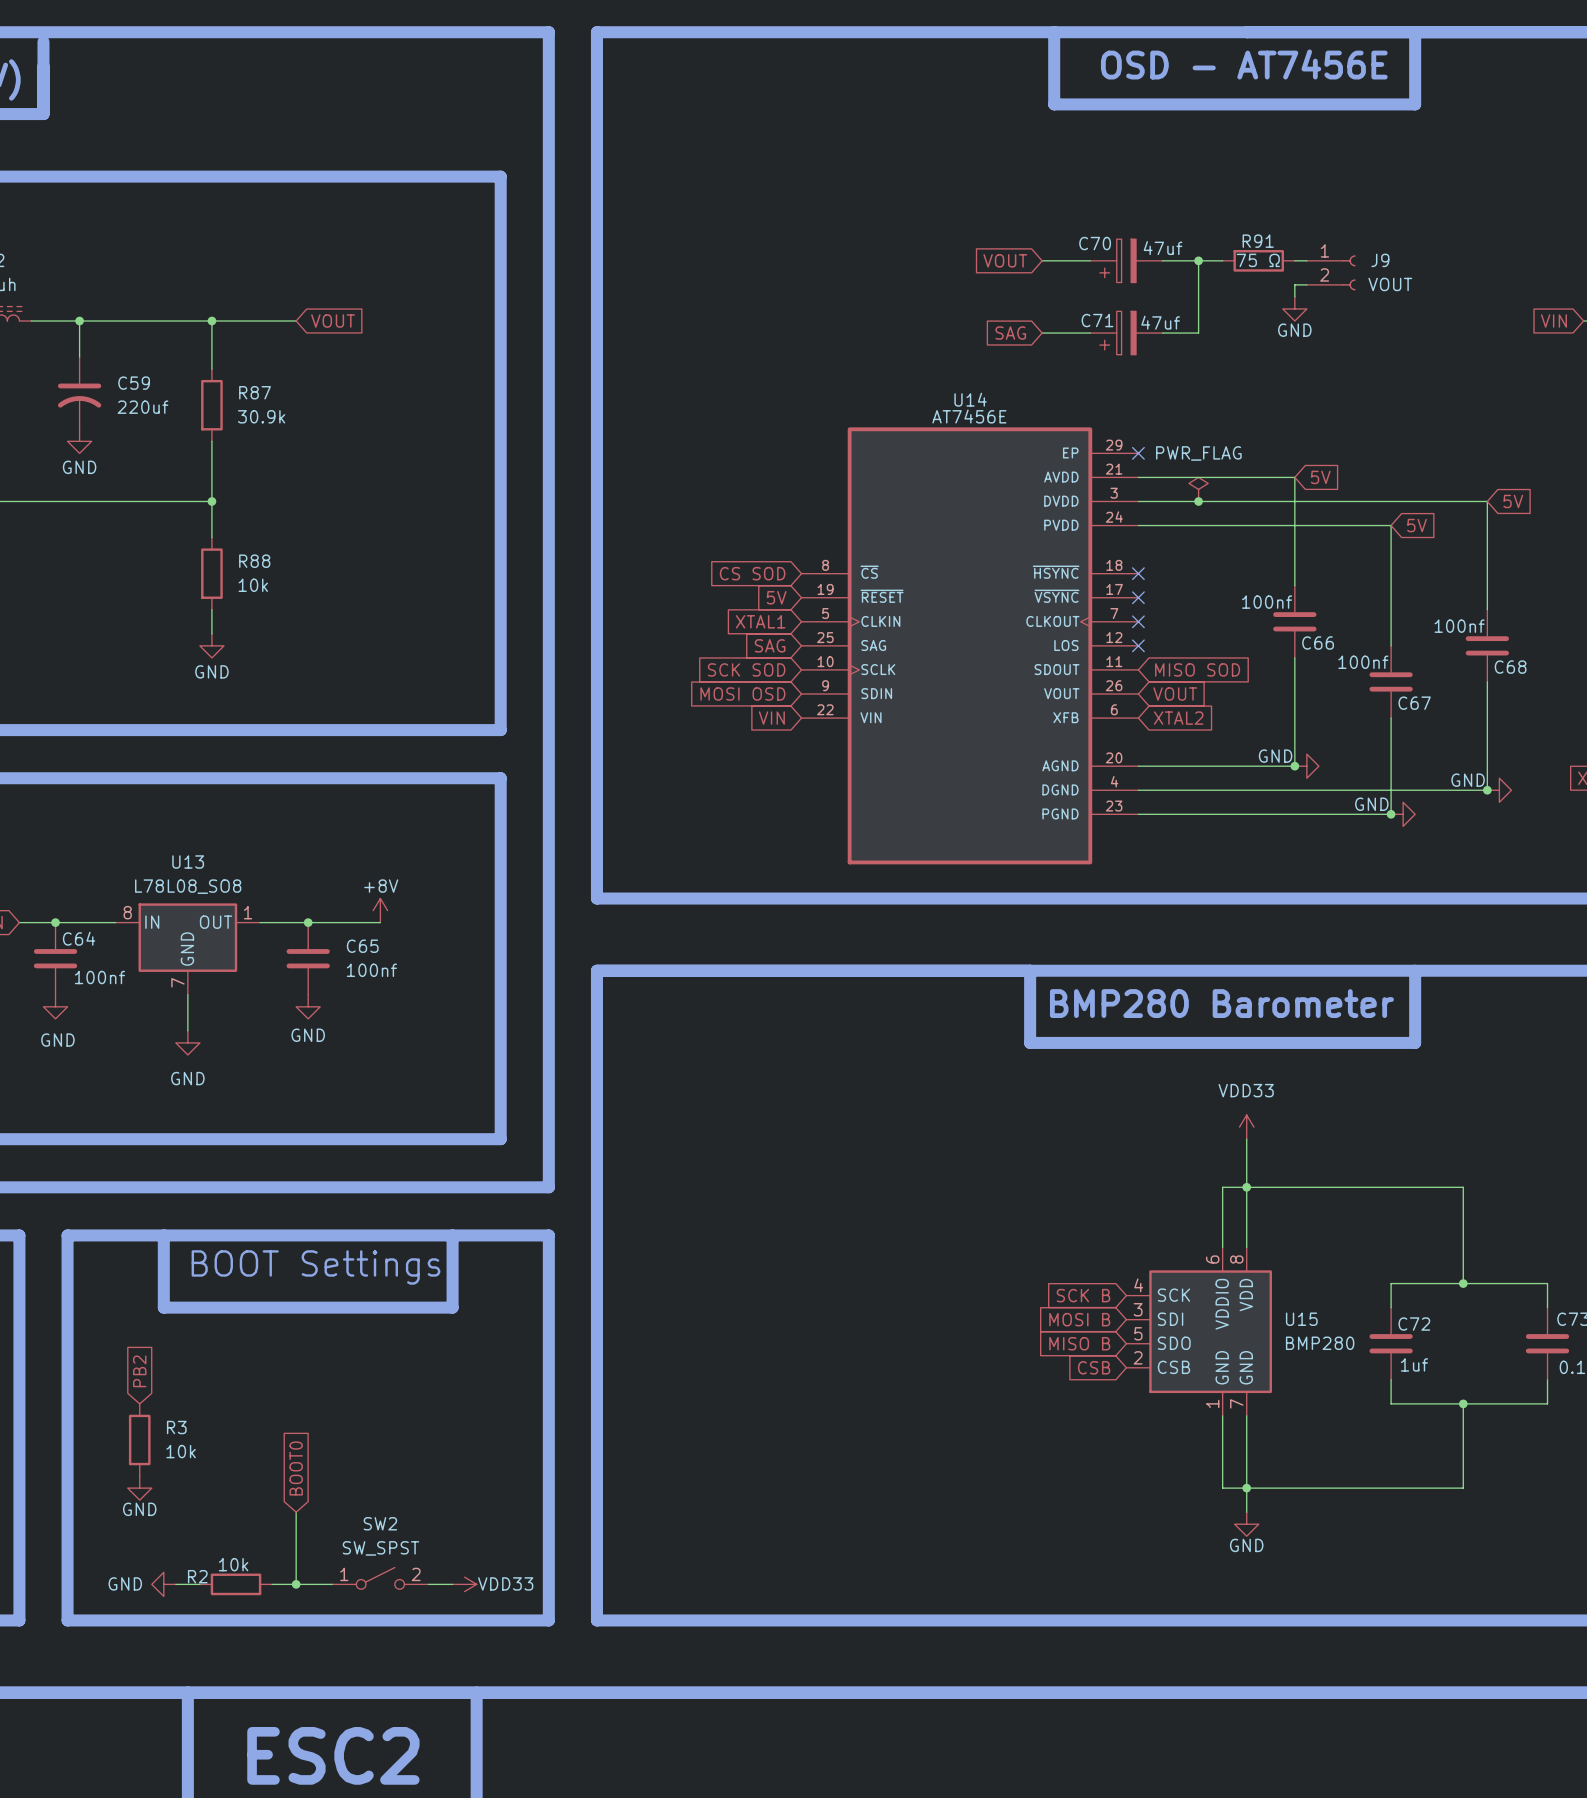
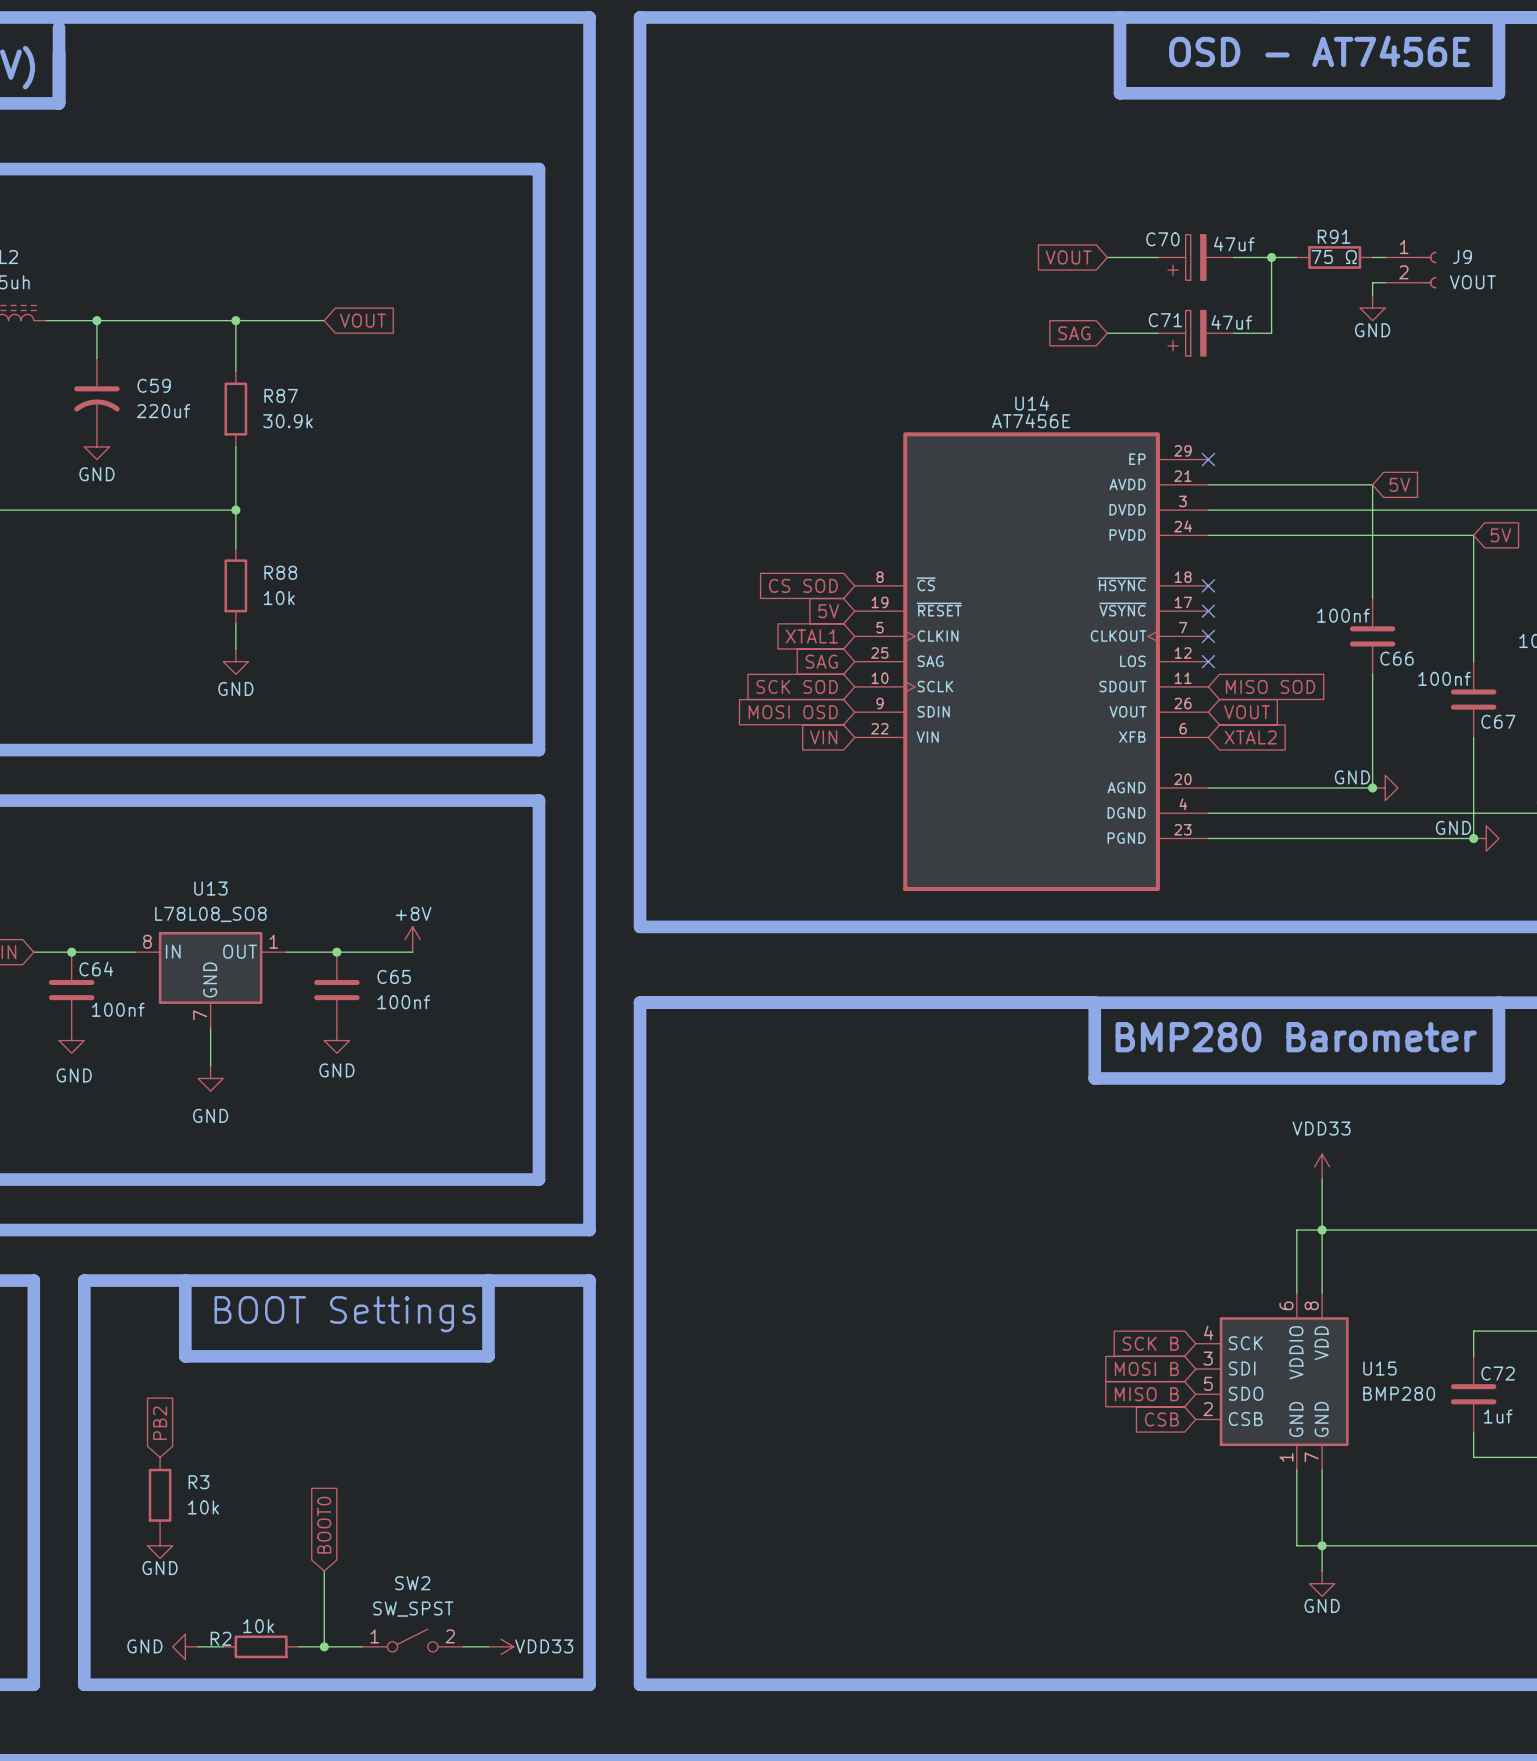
power symbol: PWR_FLAG (1198, 489) -> none
junction: (1198, 501) -> none

